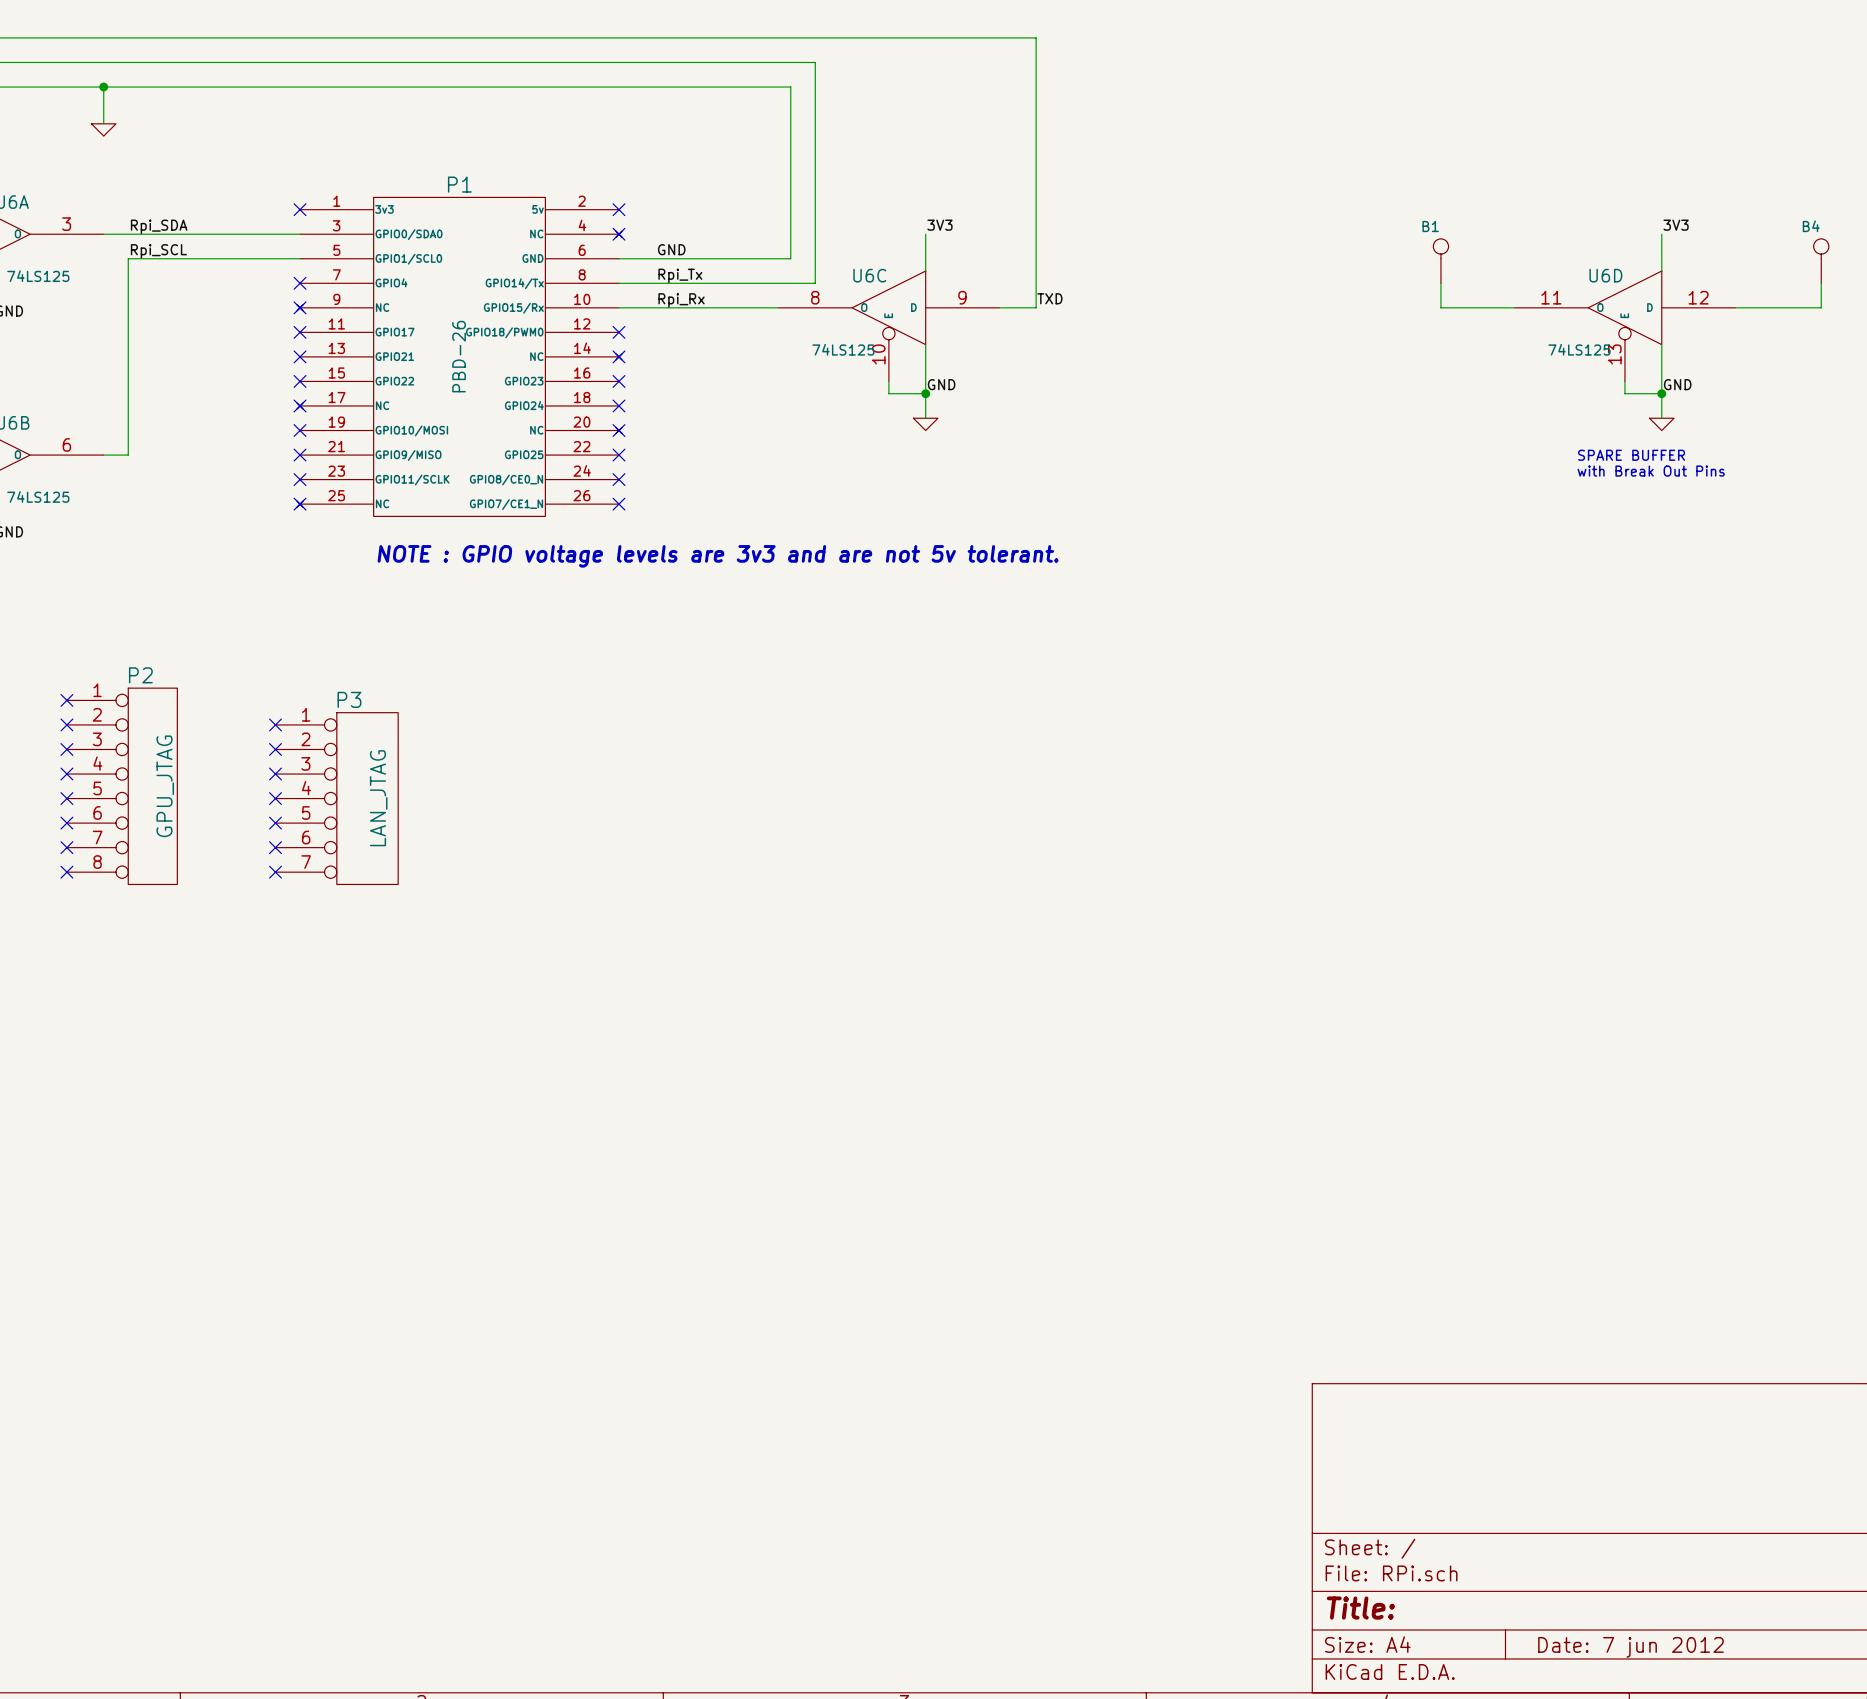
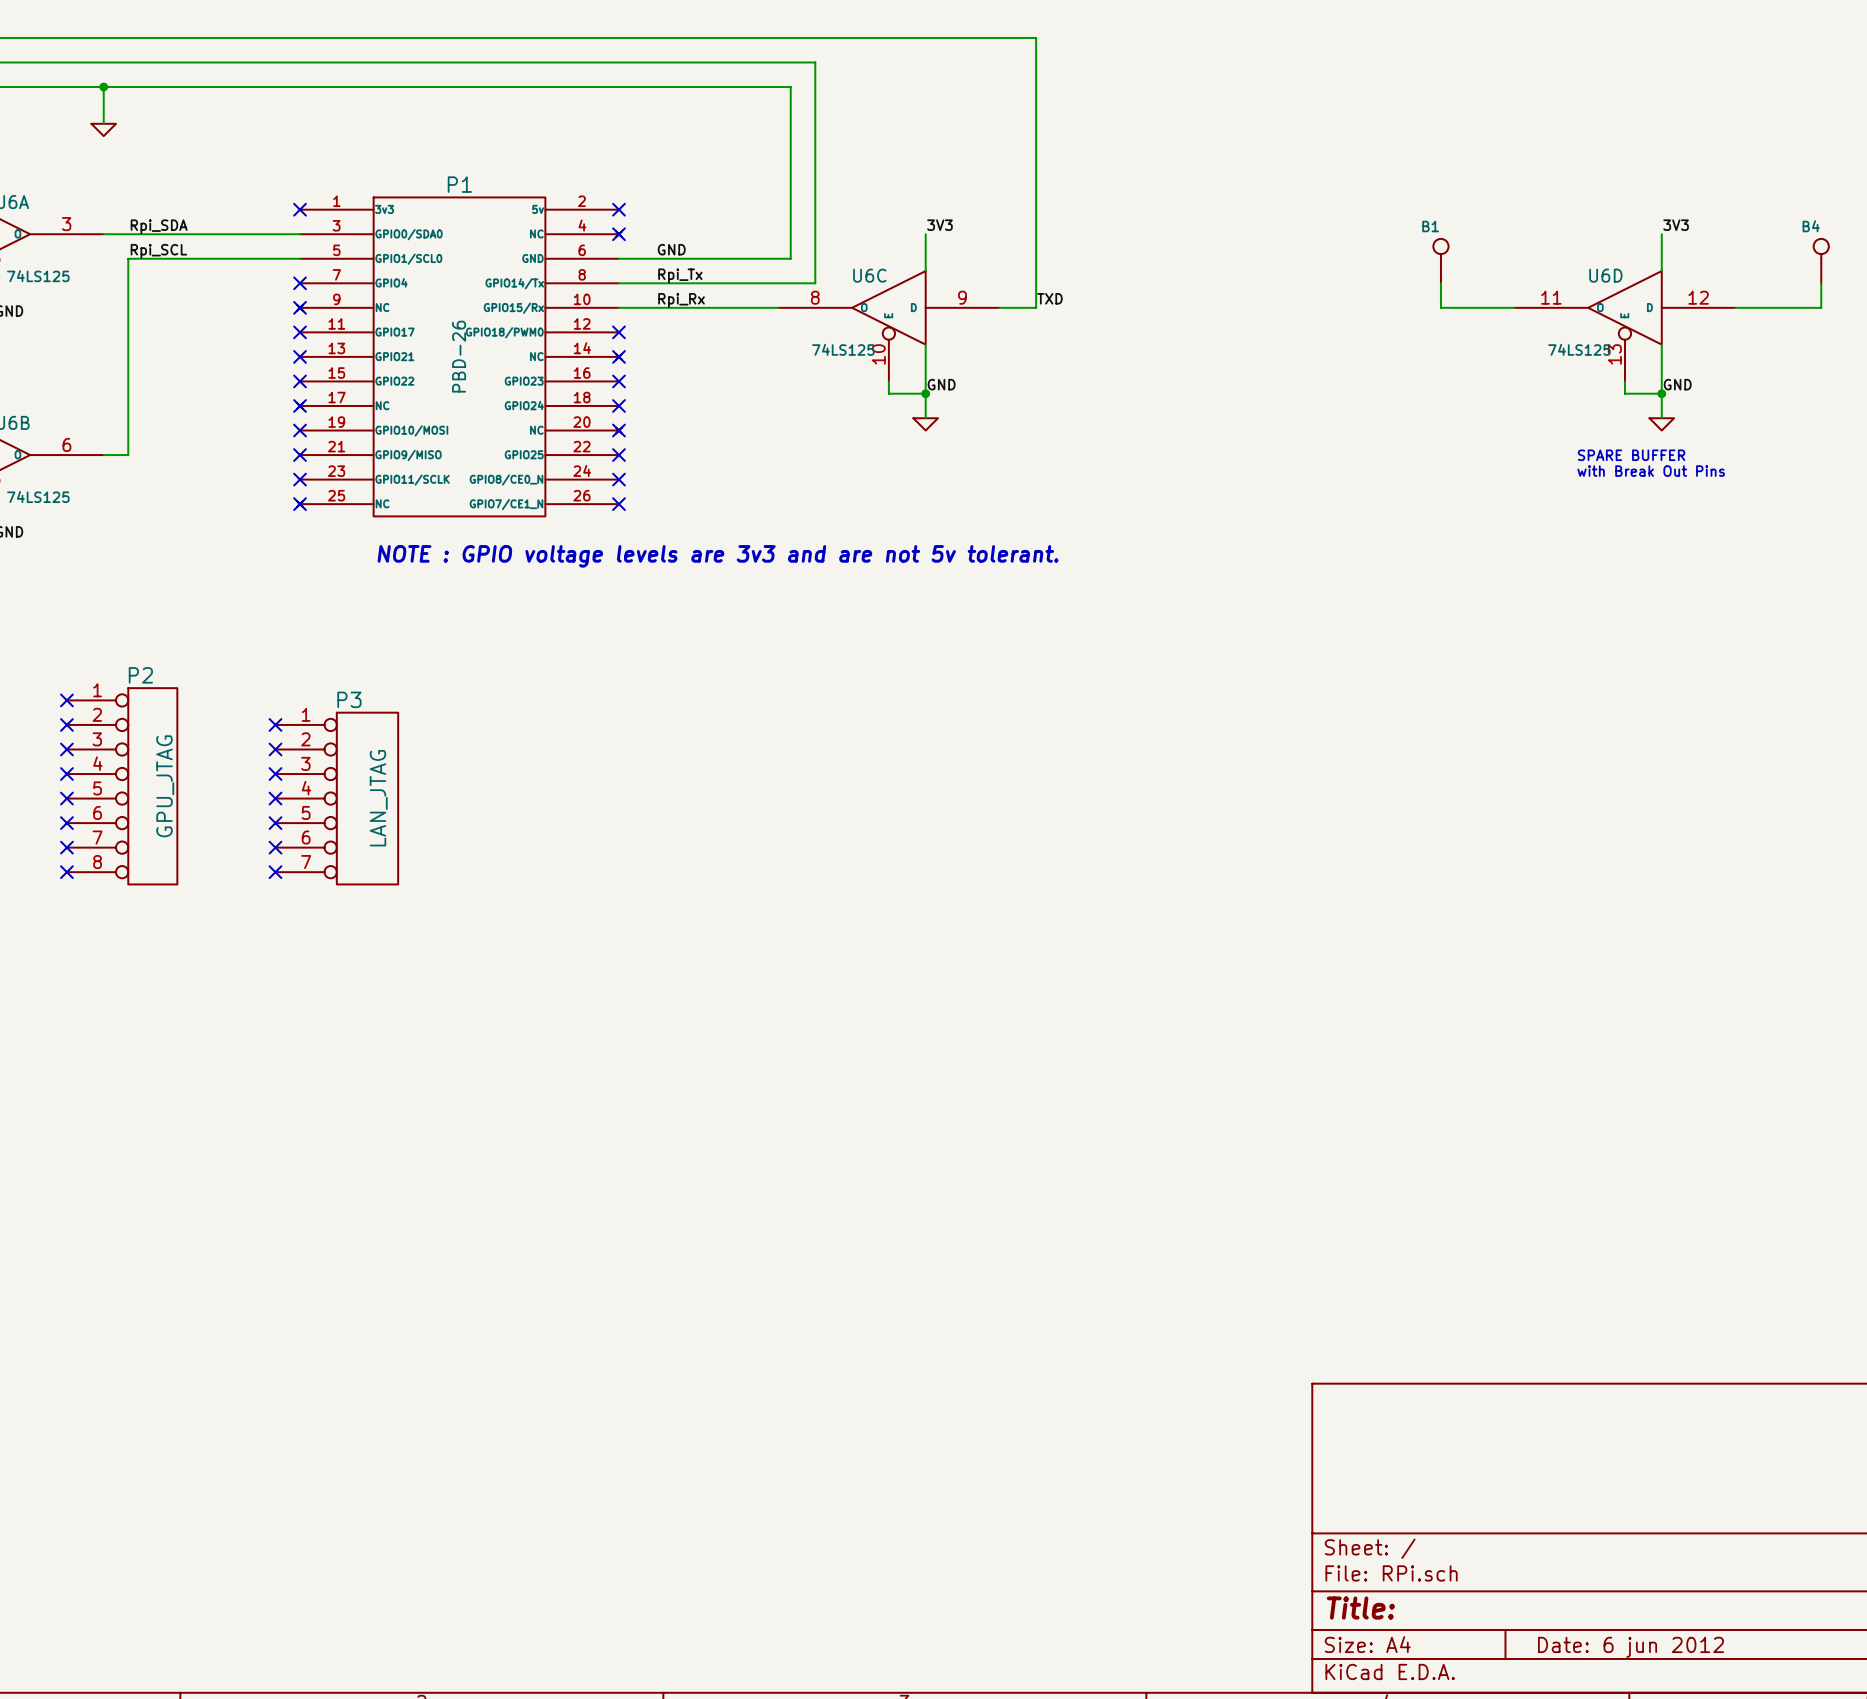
title block: Date: 7 jun 2012 (1630, 1647) -> Date: 6 jun 2012 (1630, 1647)

